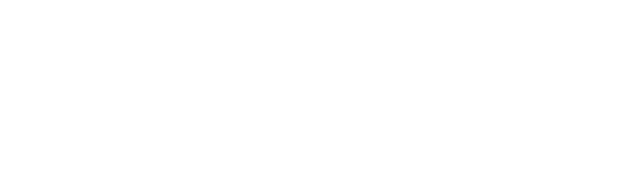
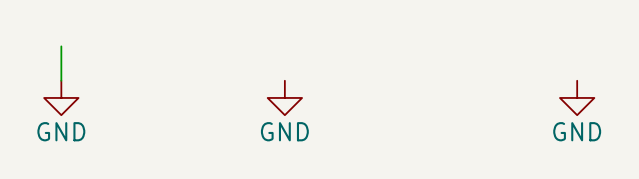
wire: none -> (61, 46) (61, 80)
power symbol: none -> GND (61, 97)
power symbol: none -> GND (284, 97)
power symbol: none -> GND (577, 97)

